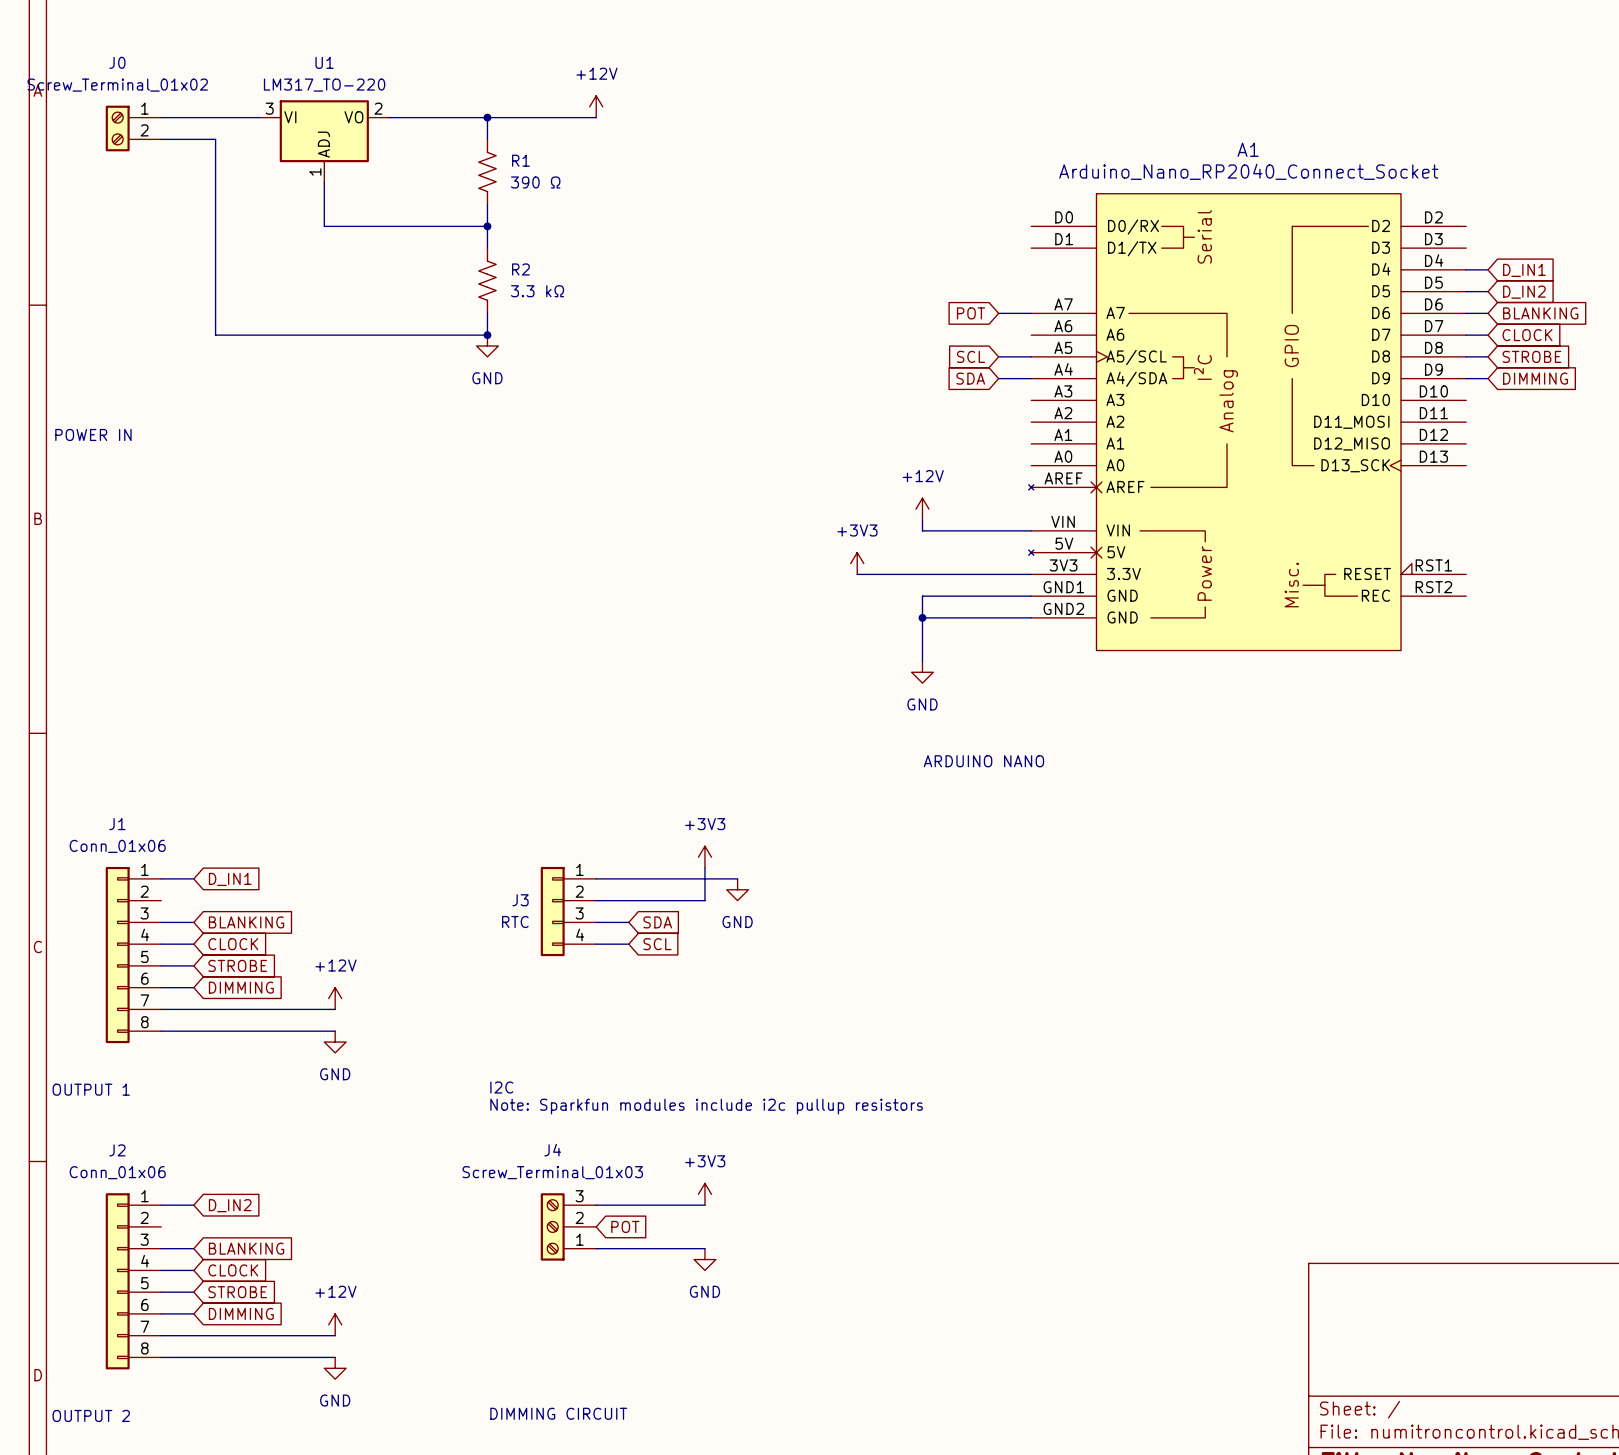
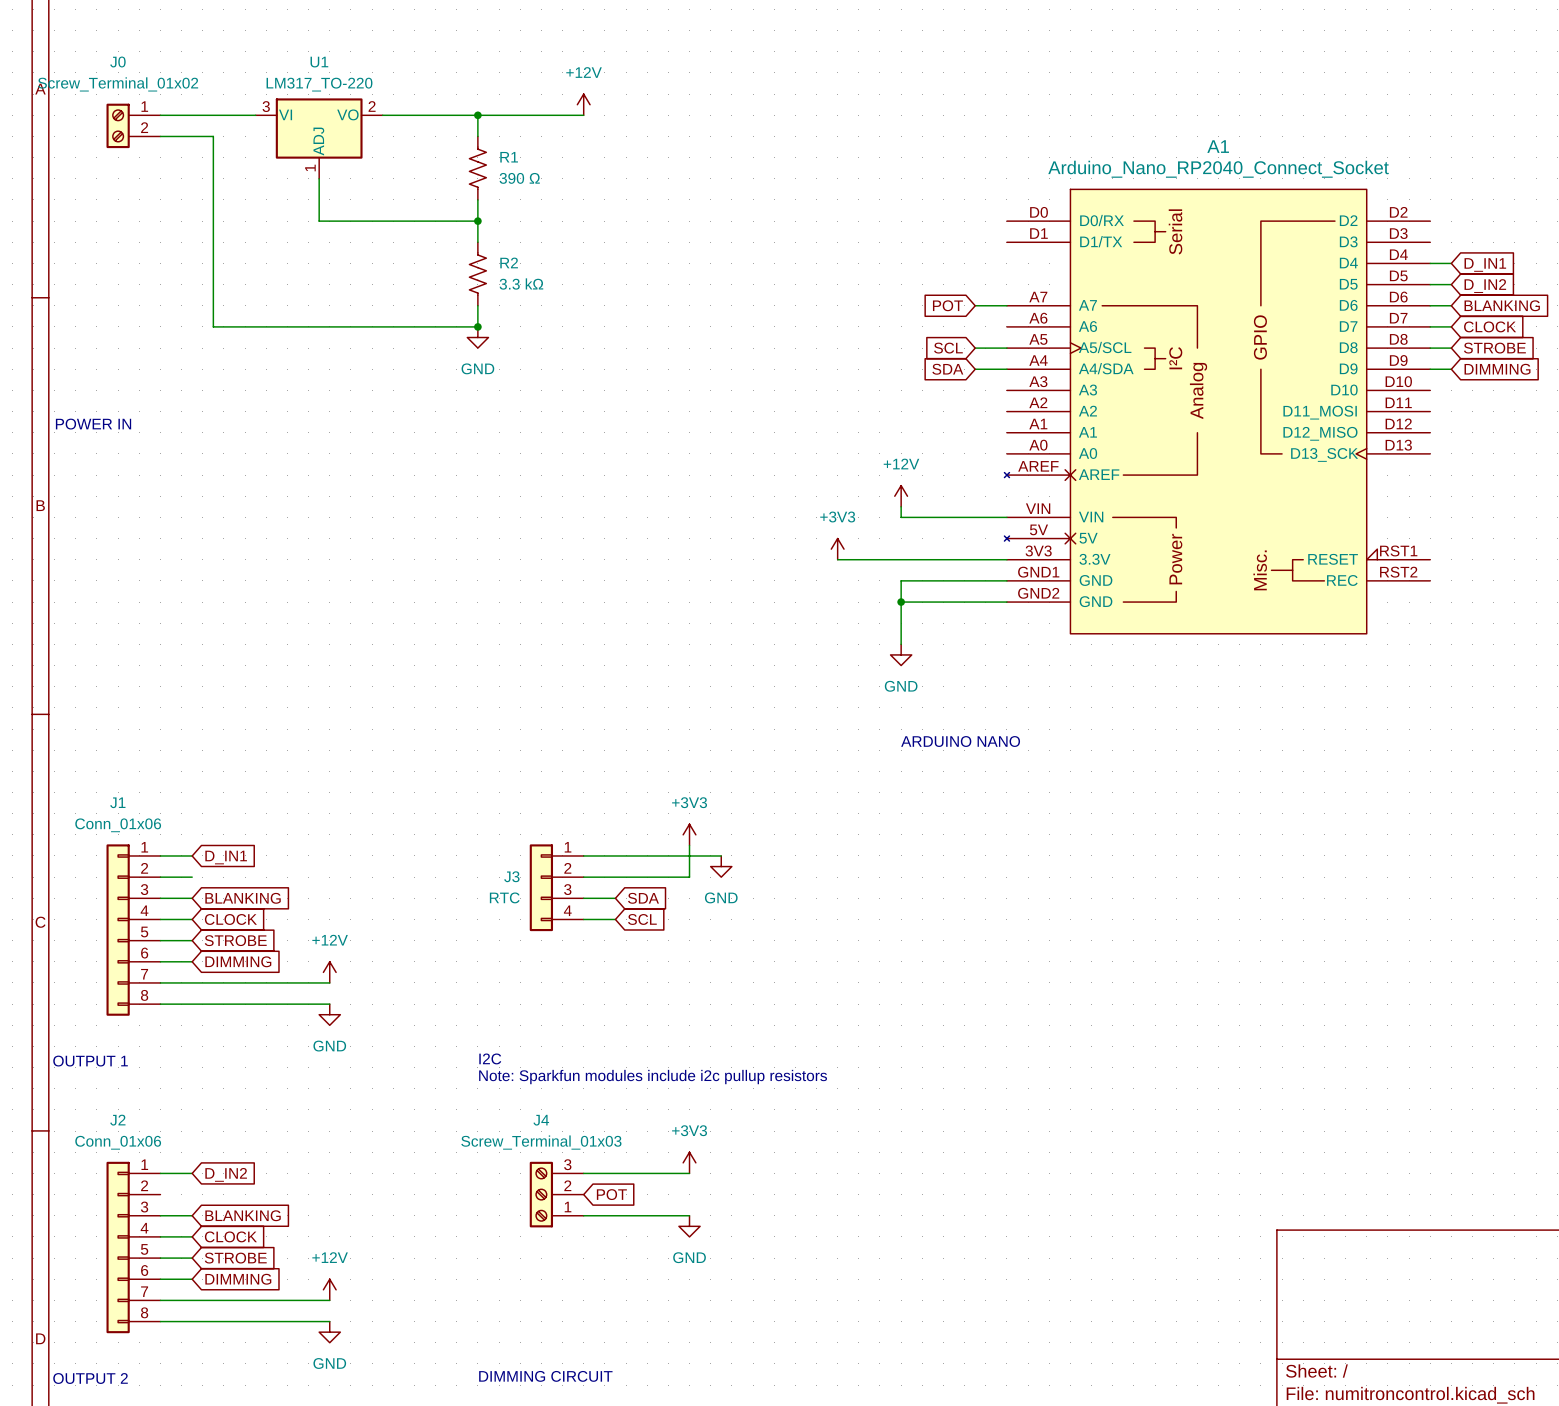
wire: none -> (160, 877) (192, 877)

